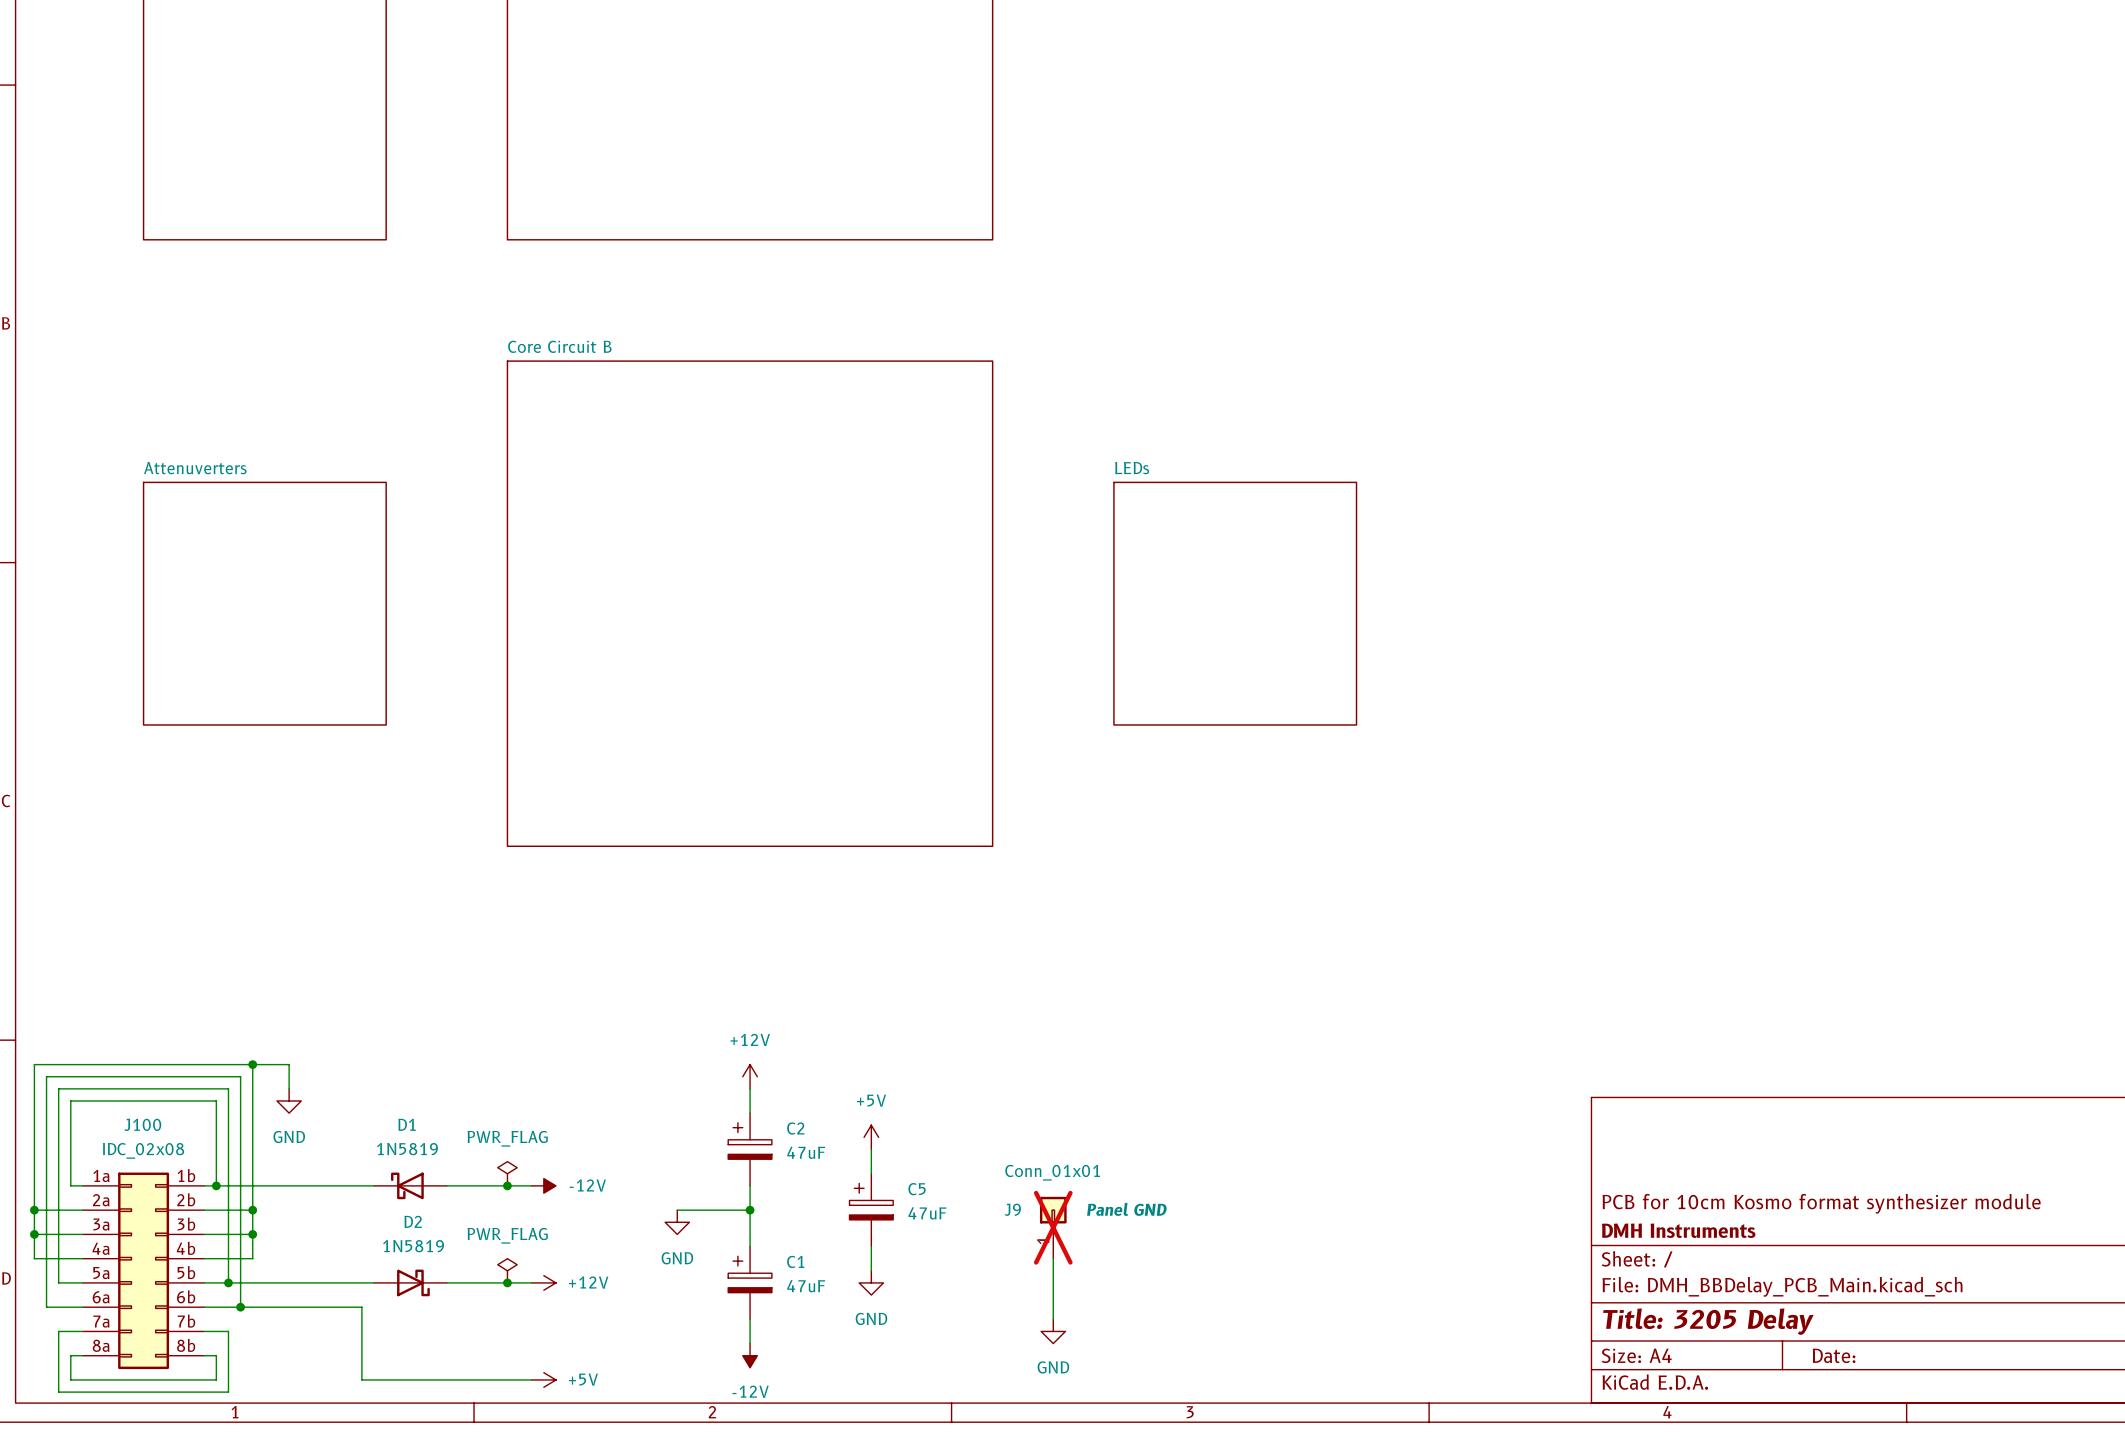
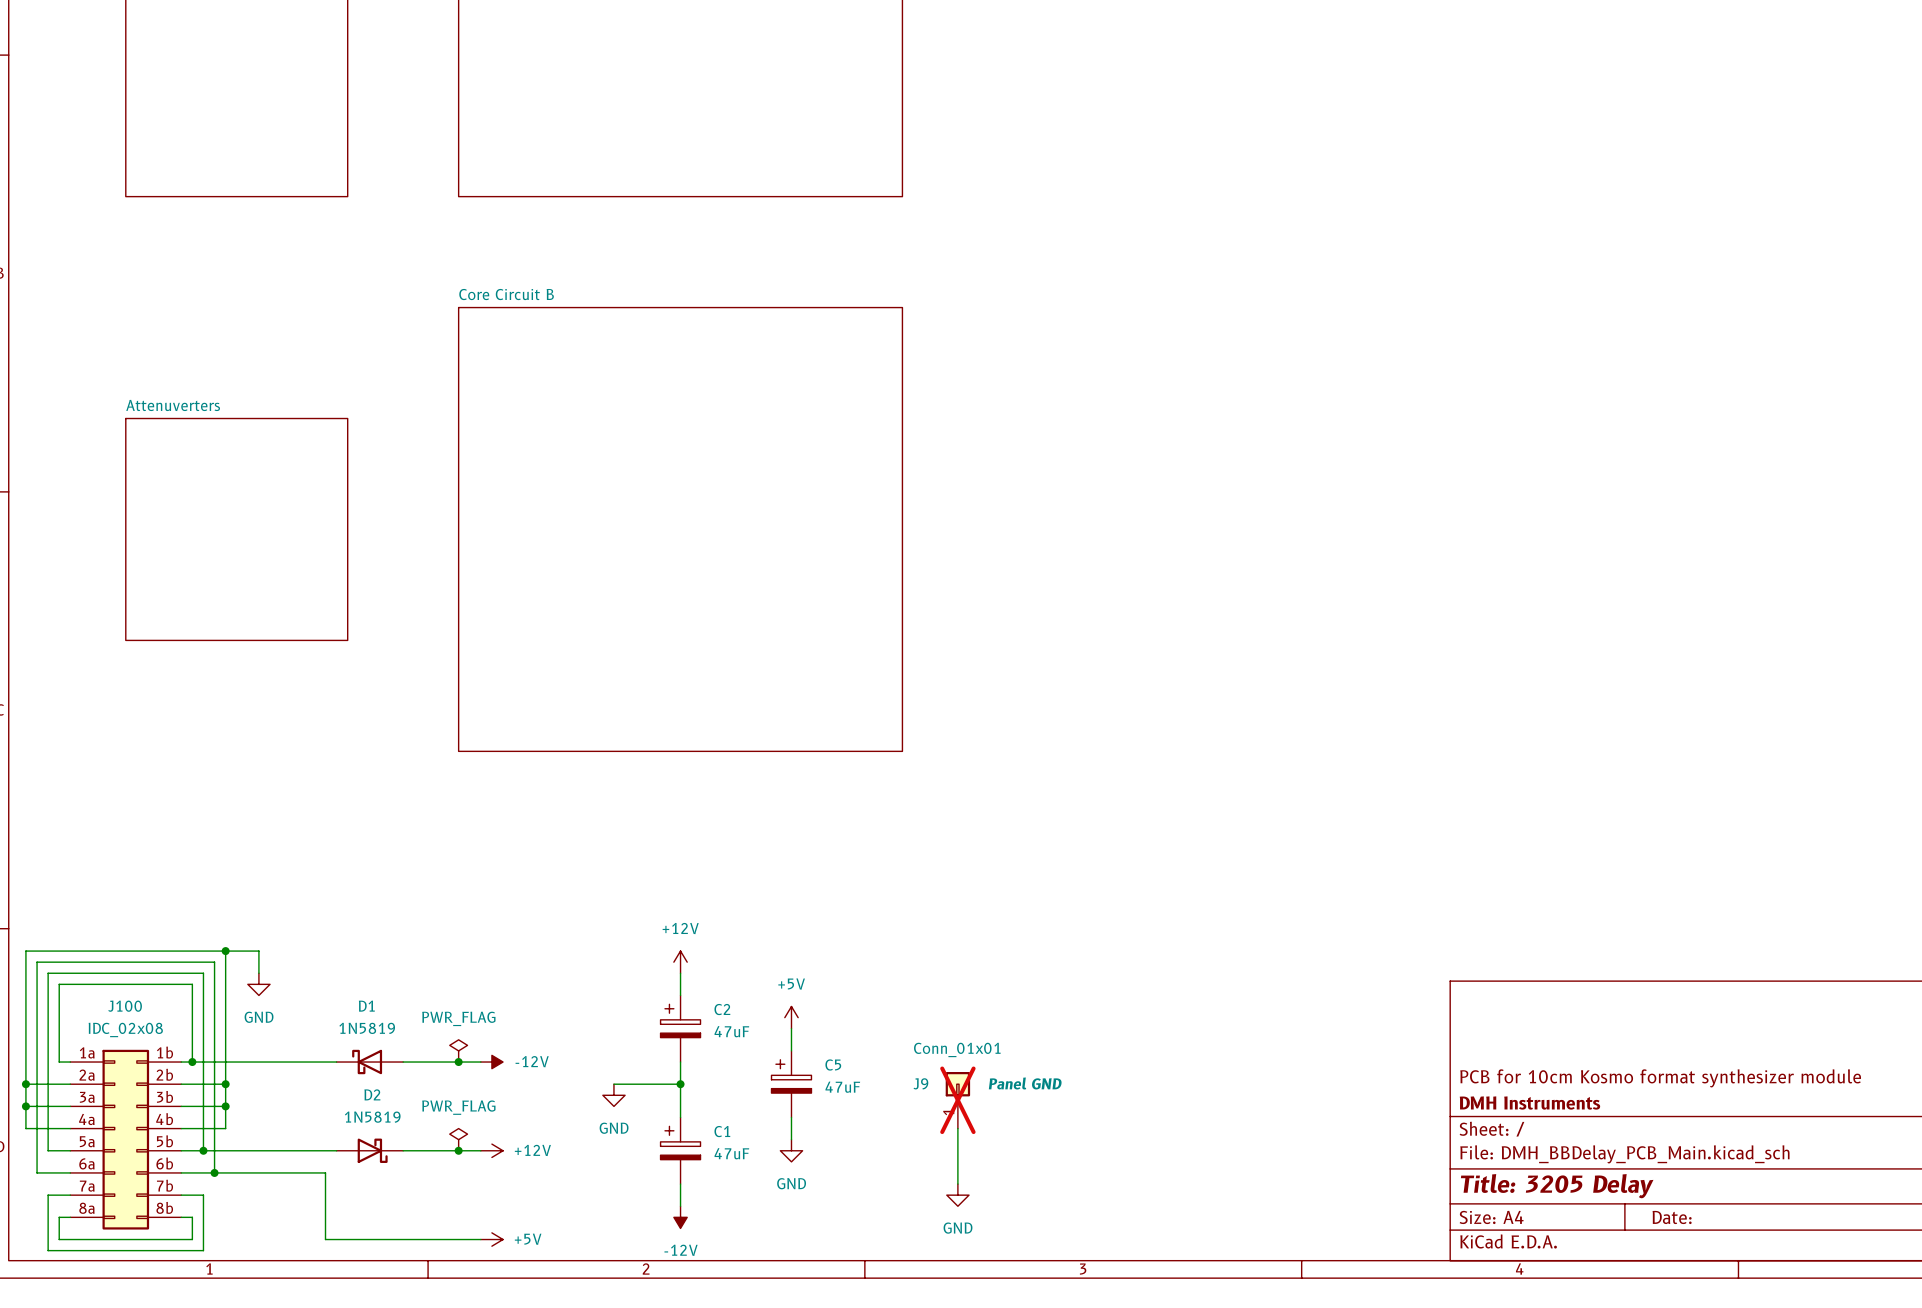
sheet LEDs: (1235, 603) -> none

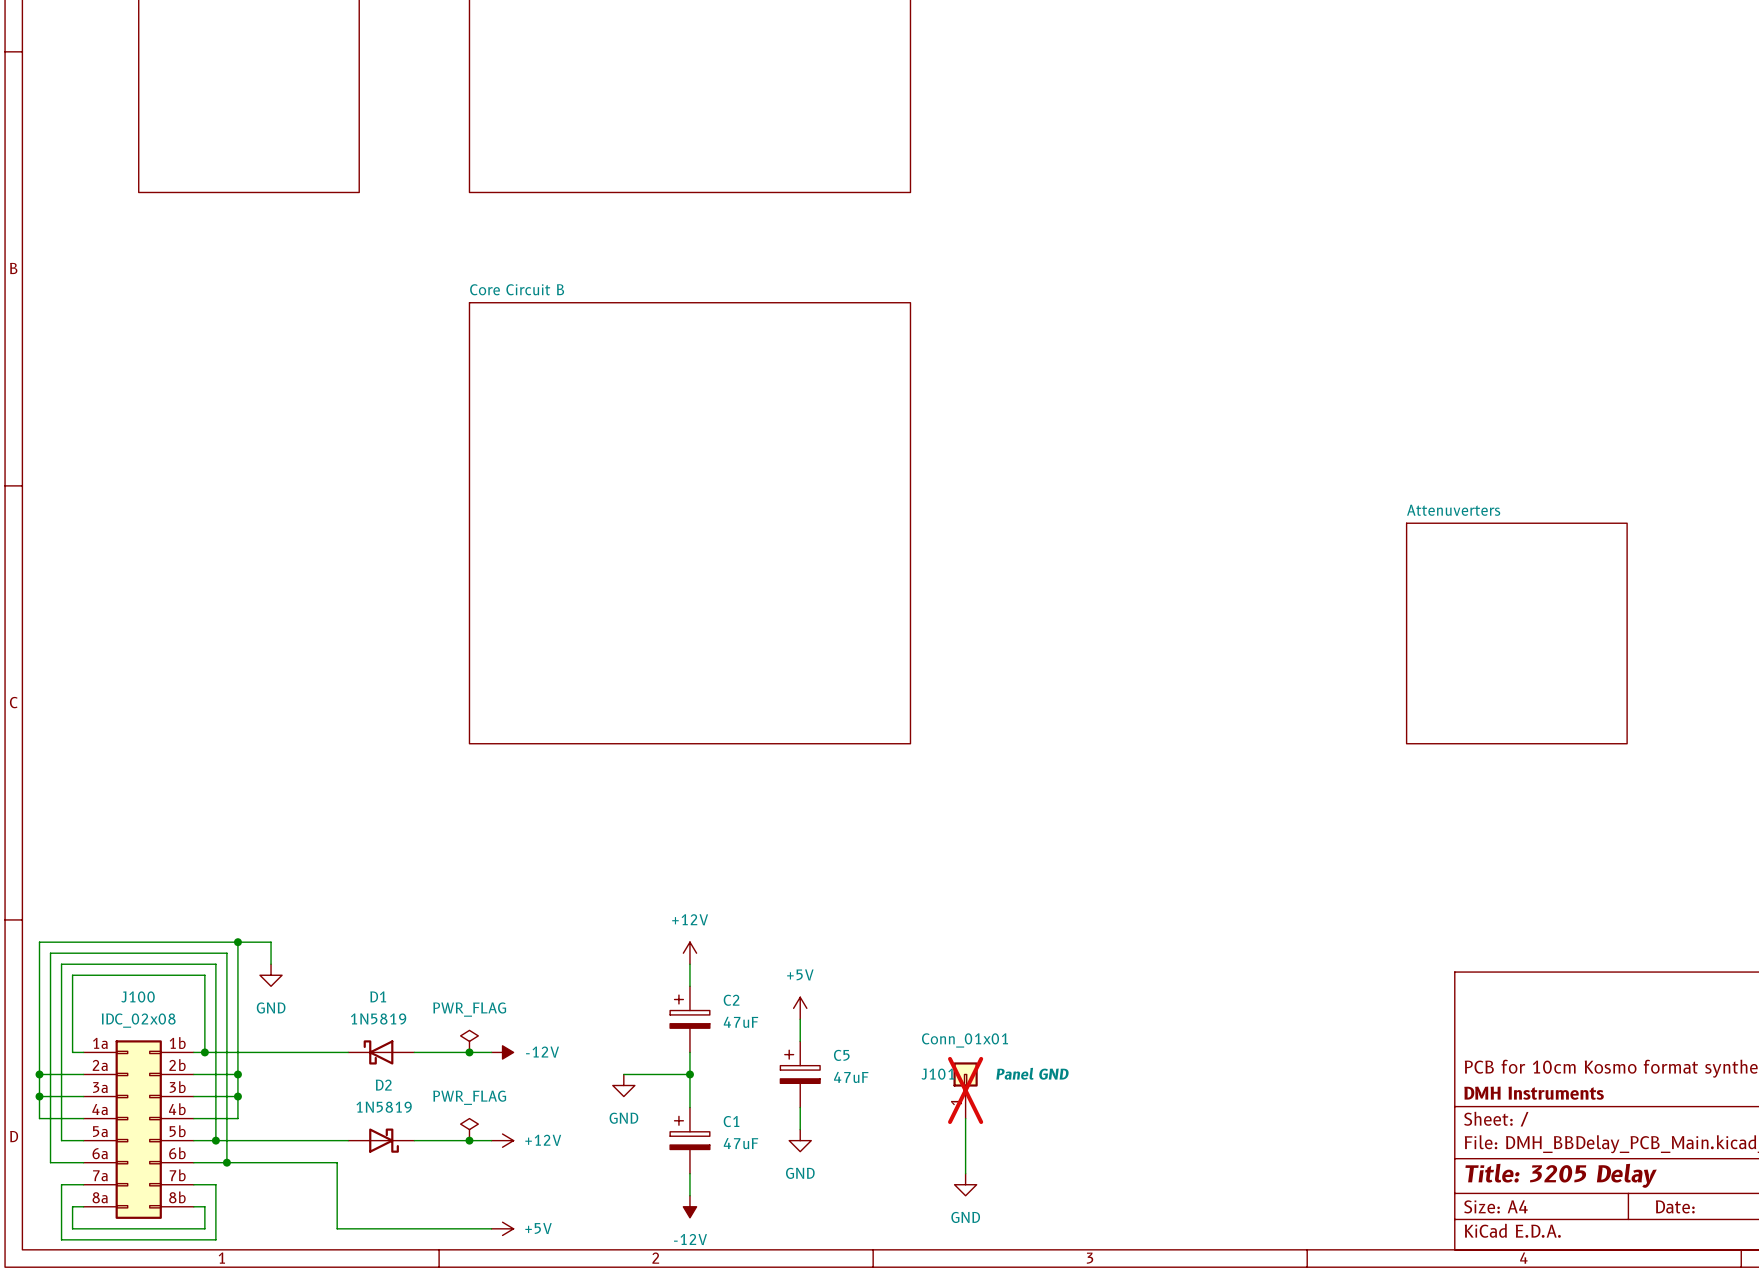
sheet Attenuverters: (236, 529) -> none
sheet Attenuverters: none -> (1516, 633)
J9 name: J9 (920, 1083) -> J101 (938, 1074)

